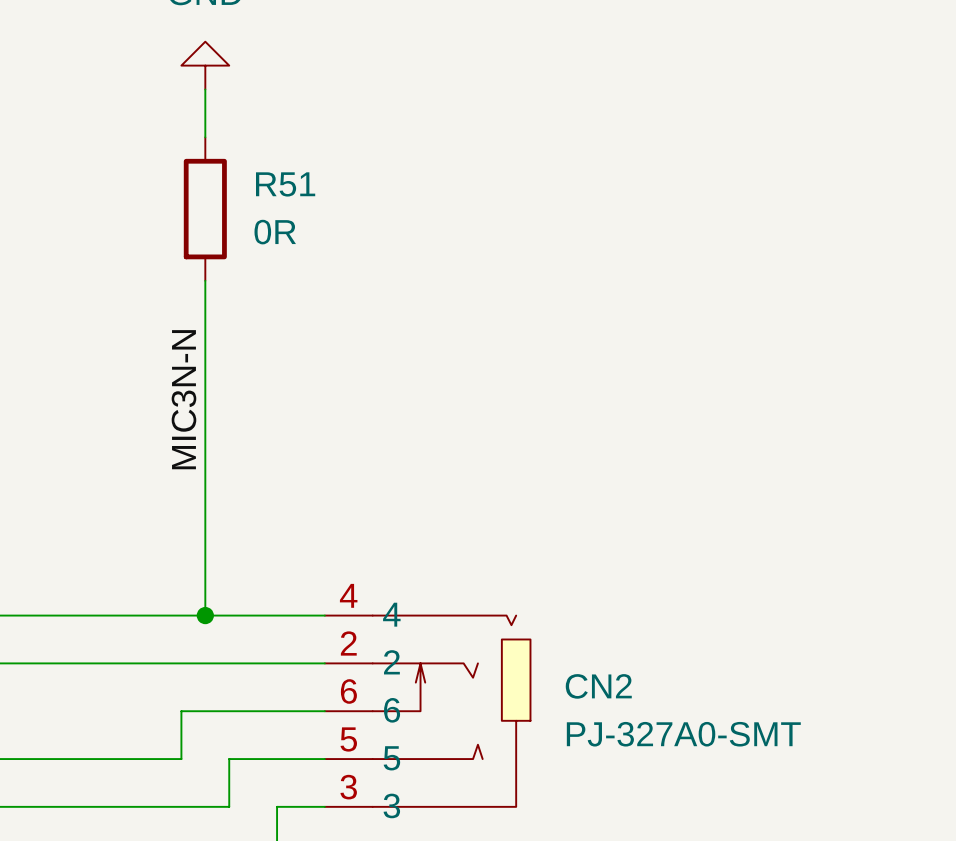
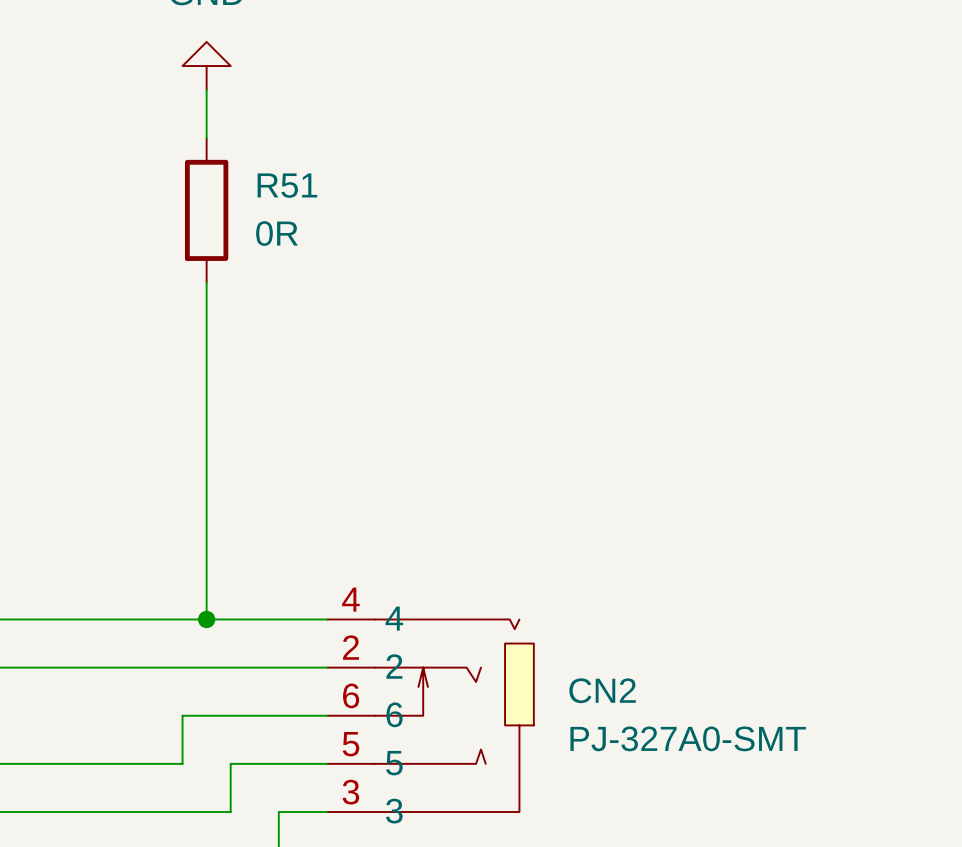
label: MIC3N-N (183, 399) -> none

